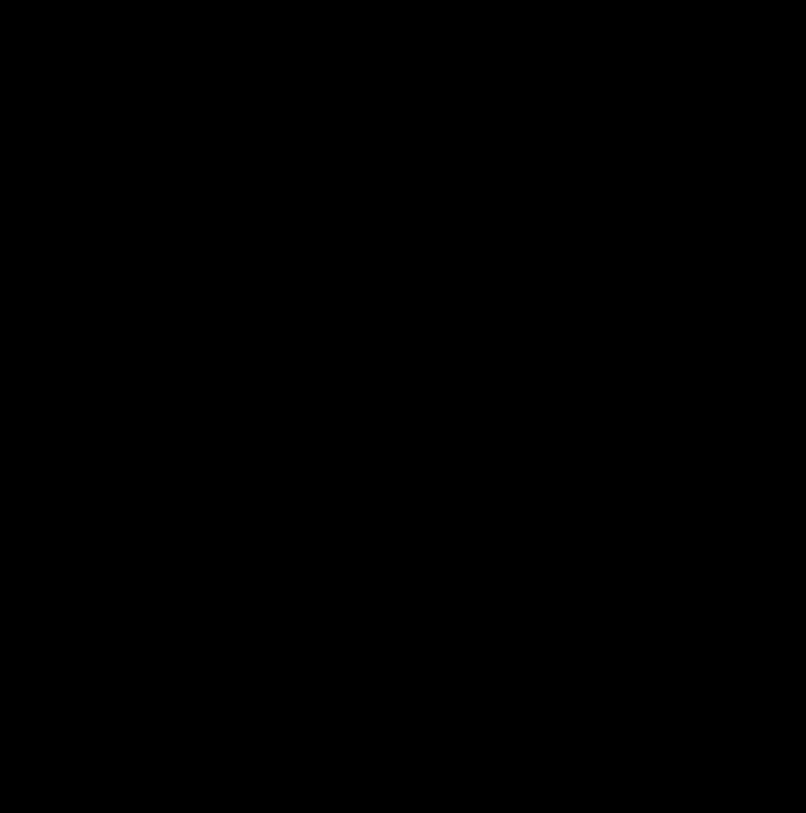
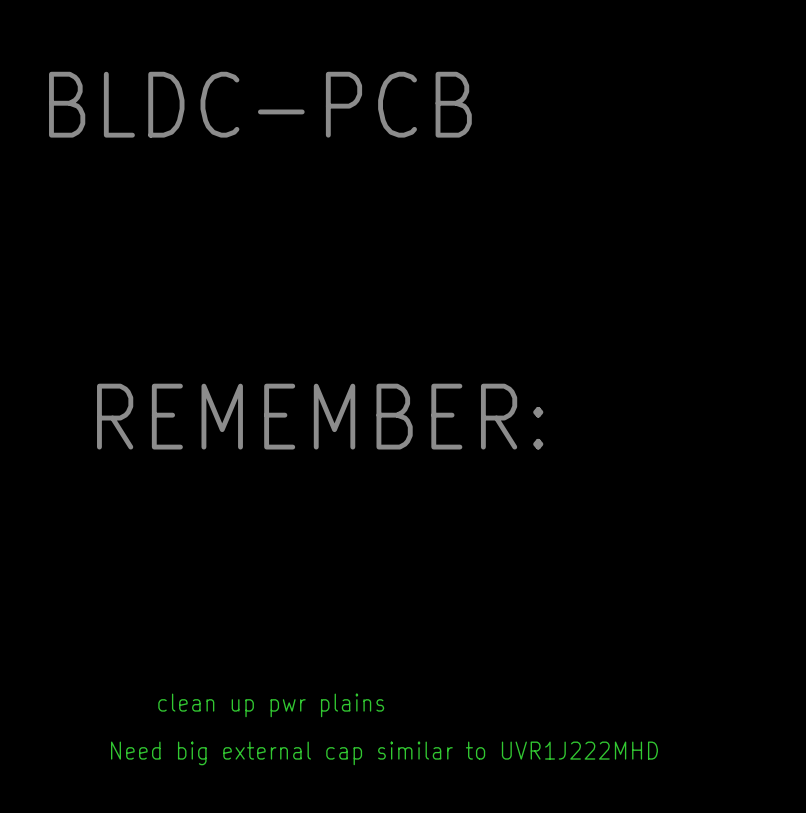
text: none -> BLDC-PCB (260, 104)
text: none -> REMEMBER: (320, 416)
text: none -> clean up pwr plains (271, 705)
text: none -> Need big external cap similar to UVR1J222MHD (384, 753)

